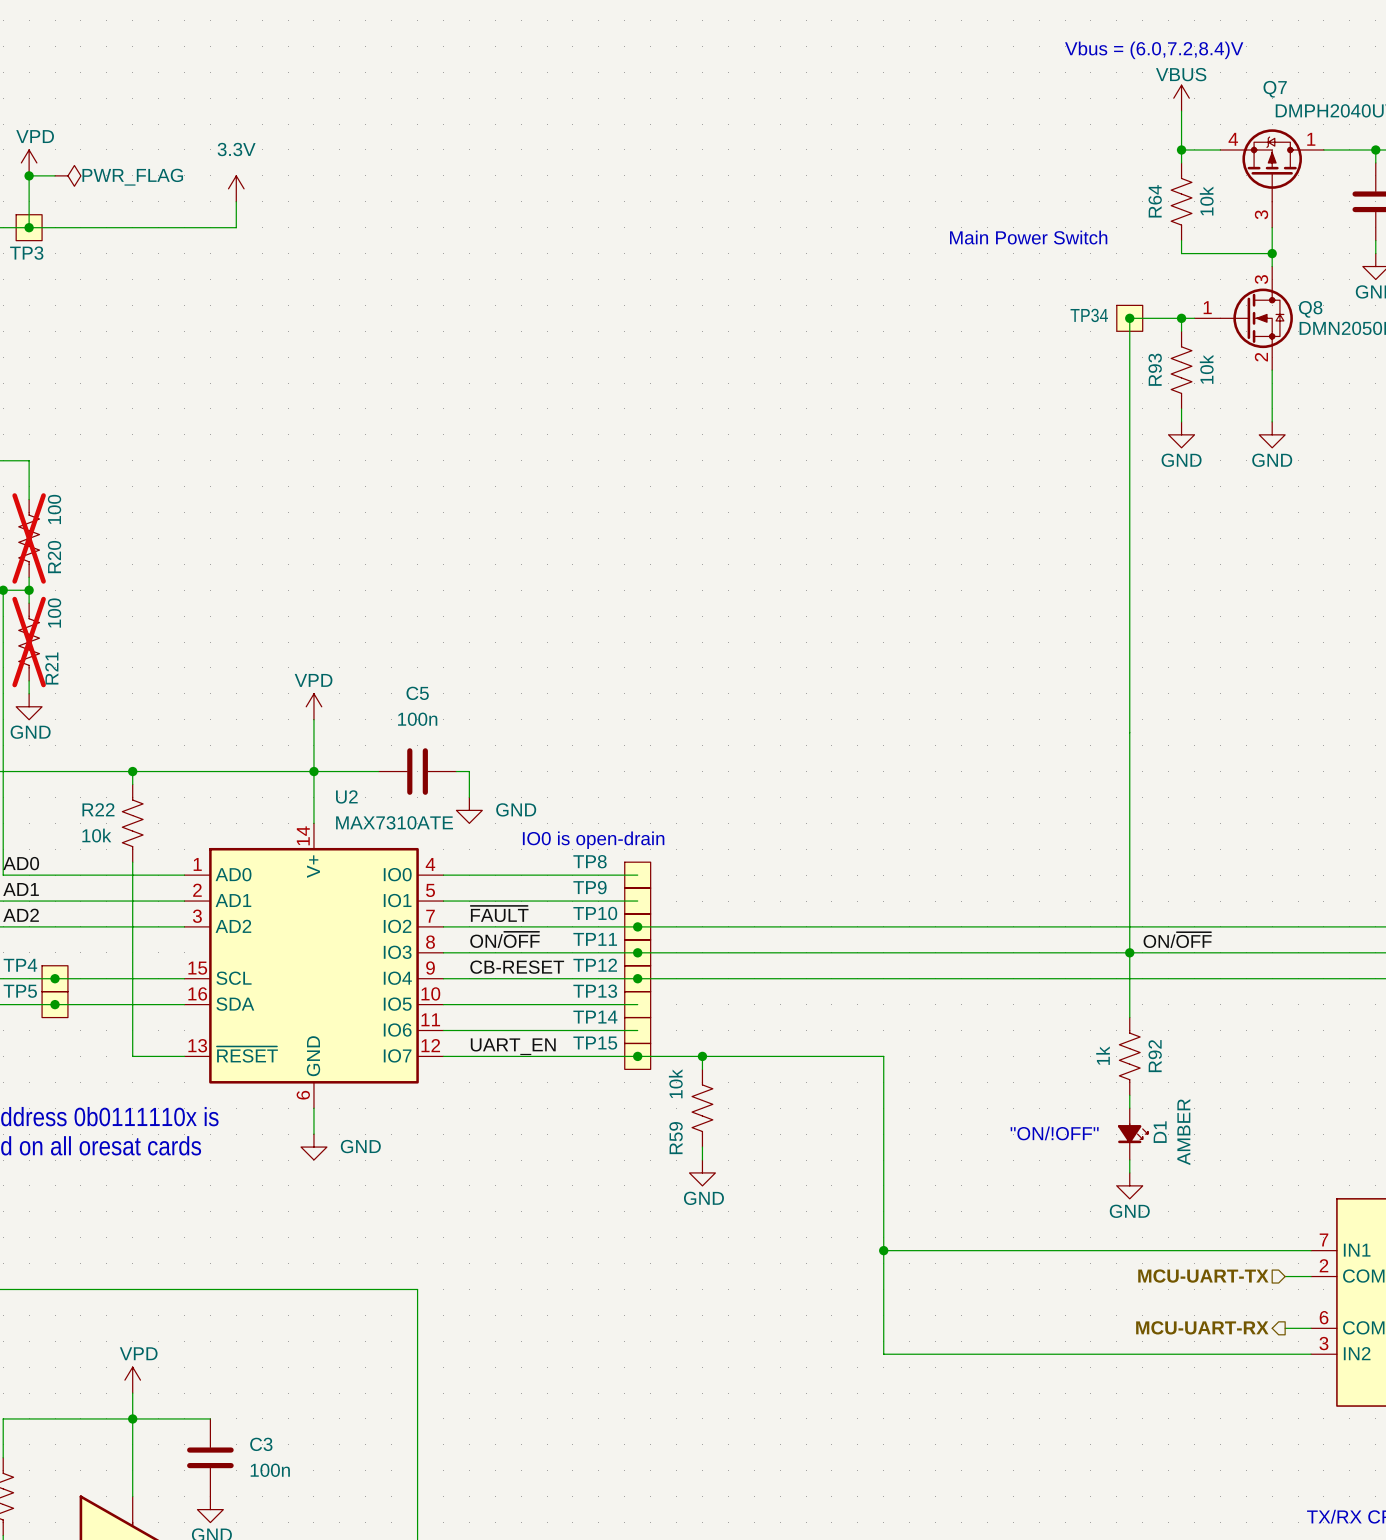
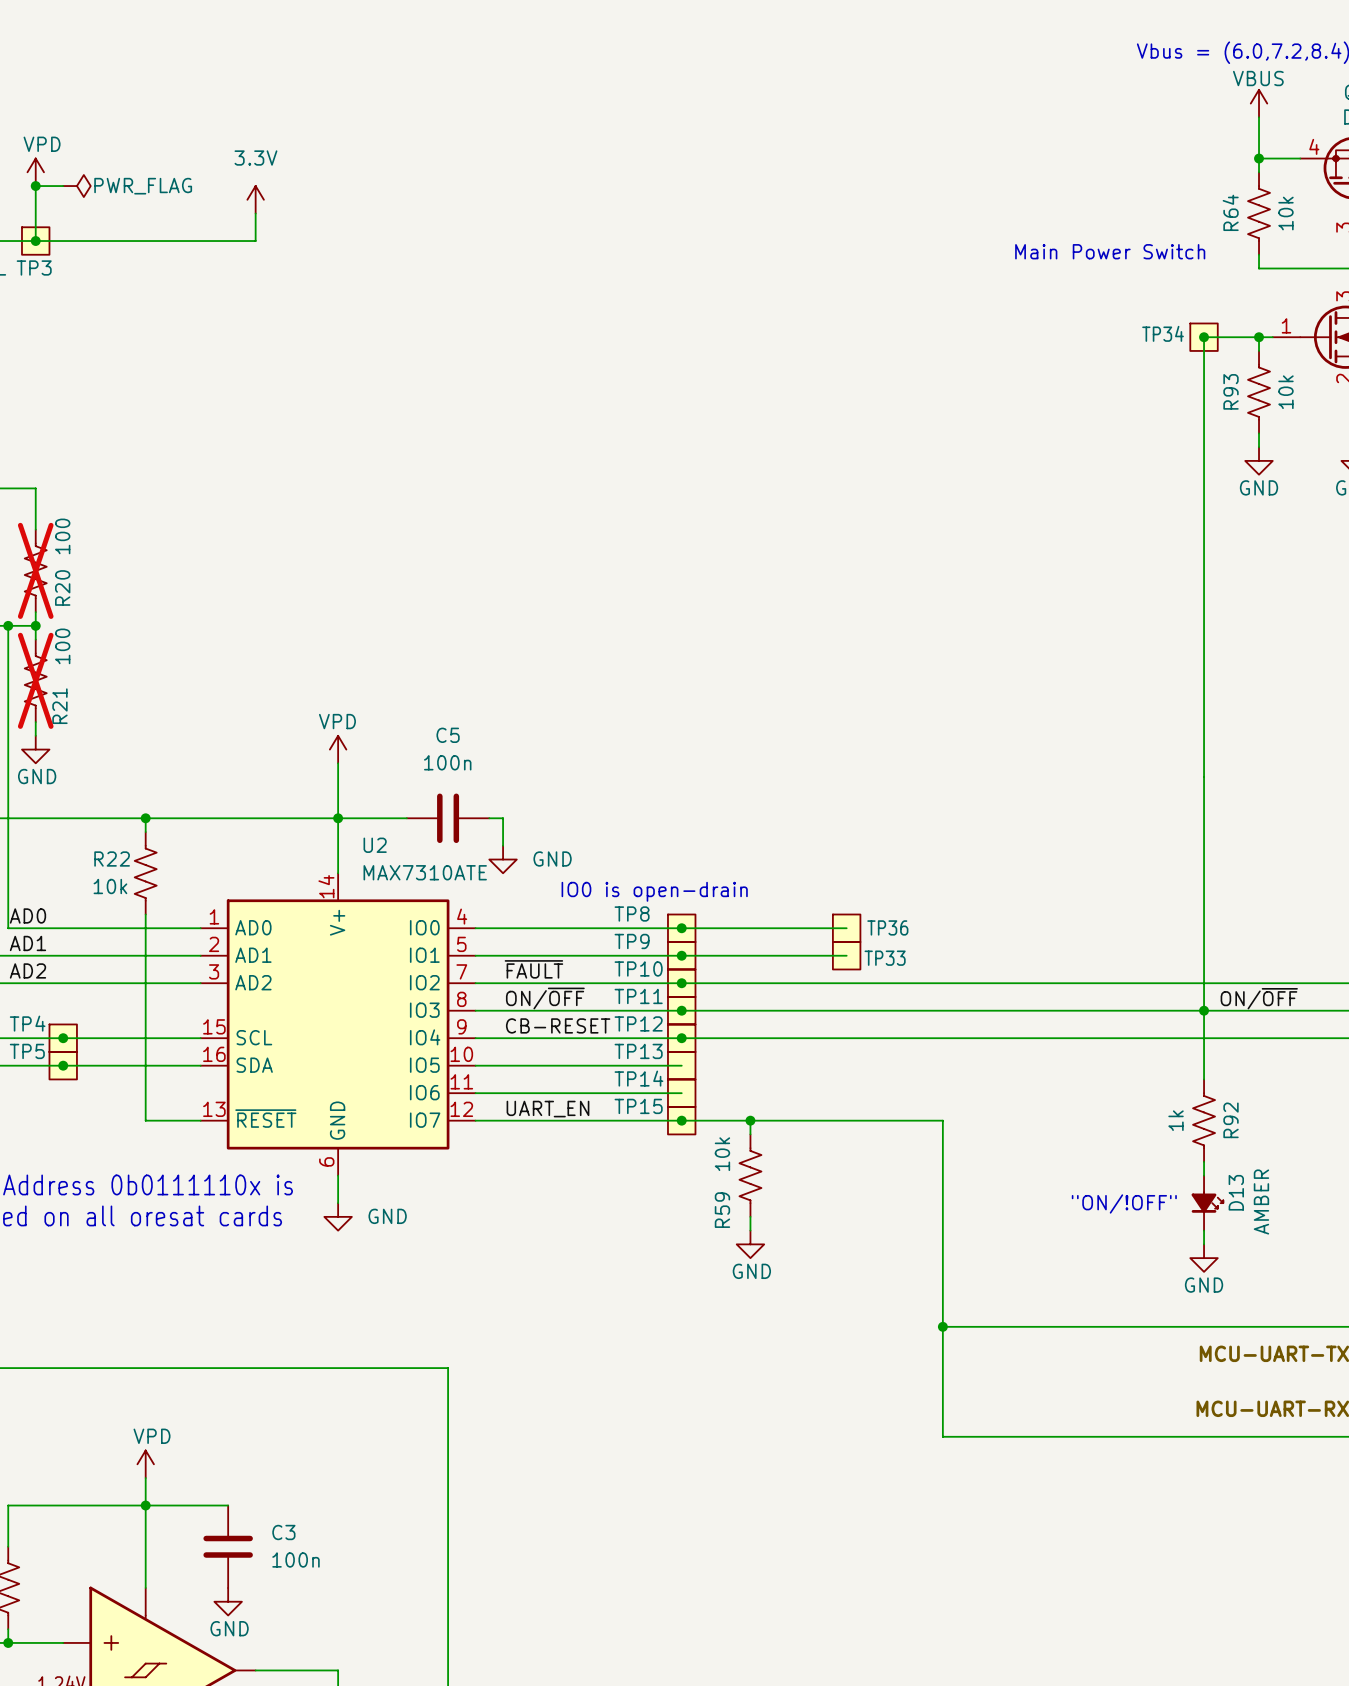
wire: none -> (681, 928) (846, 928)
junction: none -> (681, 928)
TP36: none -> (846, 928)
wire: none -> (681, 955) (846, 955)
junction: none -> (681, 955)
TP33: none -> (846, 955)
D1 name: D1 (1160, 1132) -> D13 (1236, 1192)

